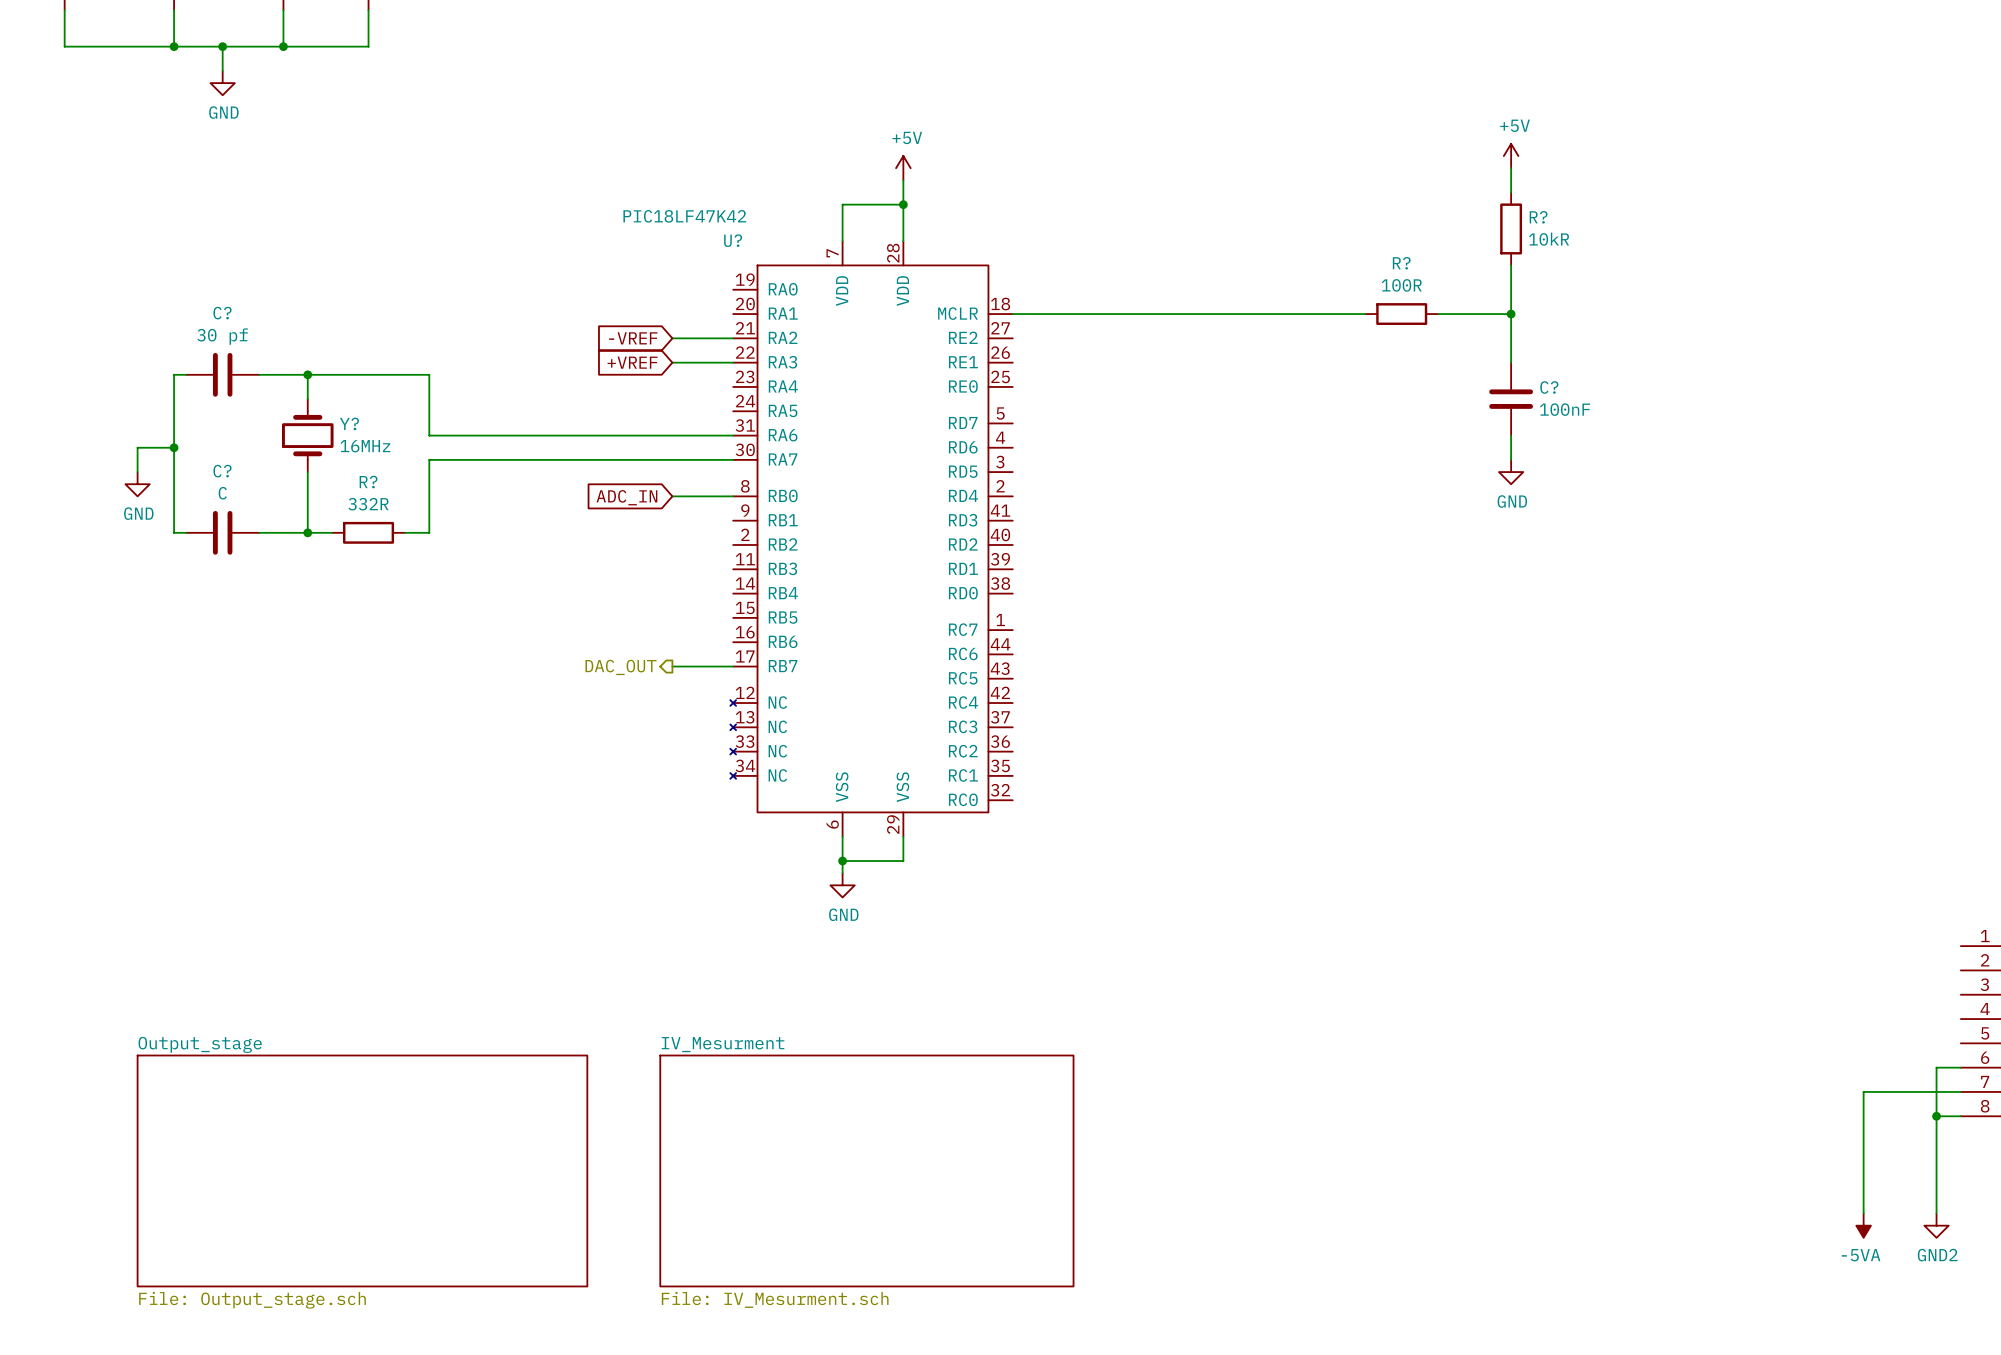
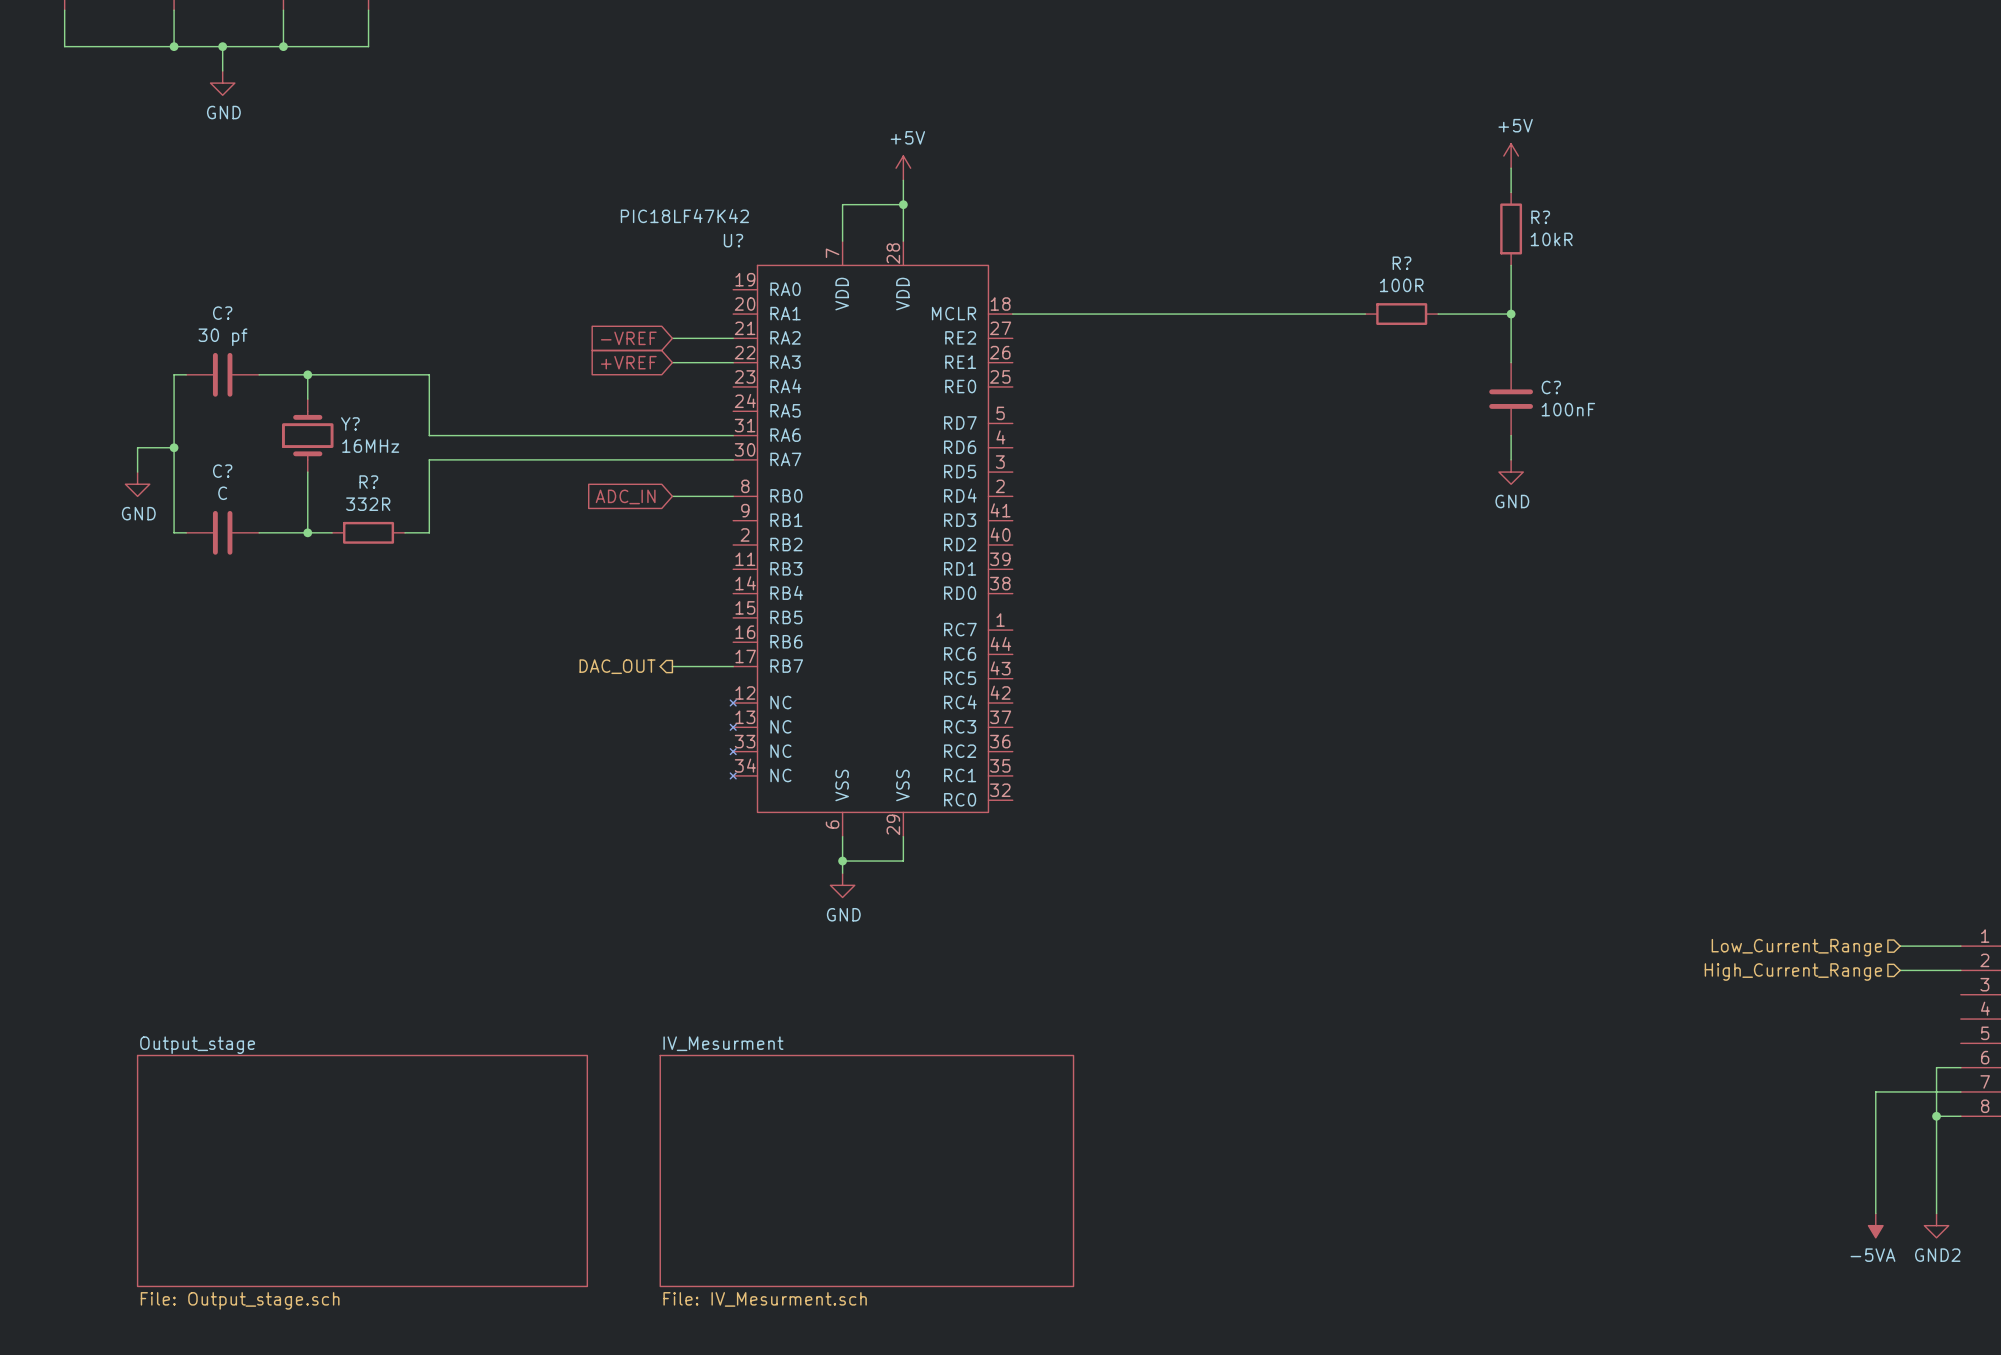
wire: none -> (1900, 946) (1960, 946)
hierarchical label: none -> Low_Current_Range (1796, 947)
wire: none -> (1900, 970) (1960, 970)
hierarchical label: none -> High_Current_Range (1793, 971)
wire: (1875, 1091) (1863, 1091) (1863, 1213) -> (1875, 1091) (1875, 1213)
power symbol position: -5VA (1863, 1225) -> -5VA (1875, 1225)

